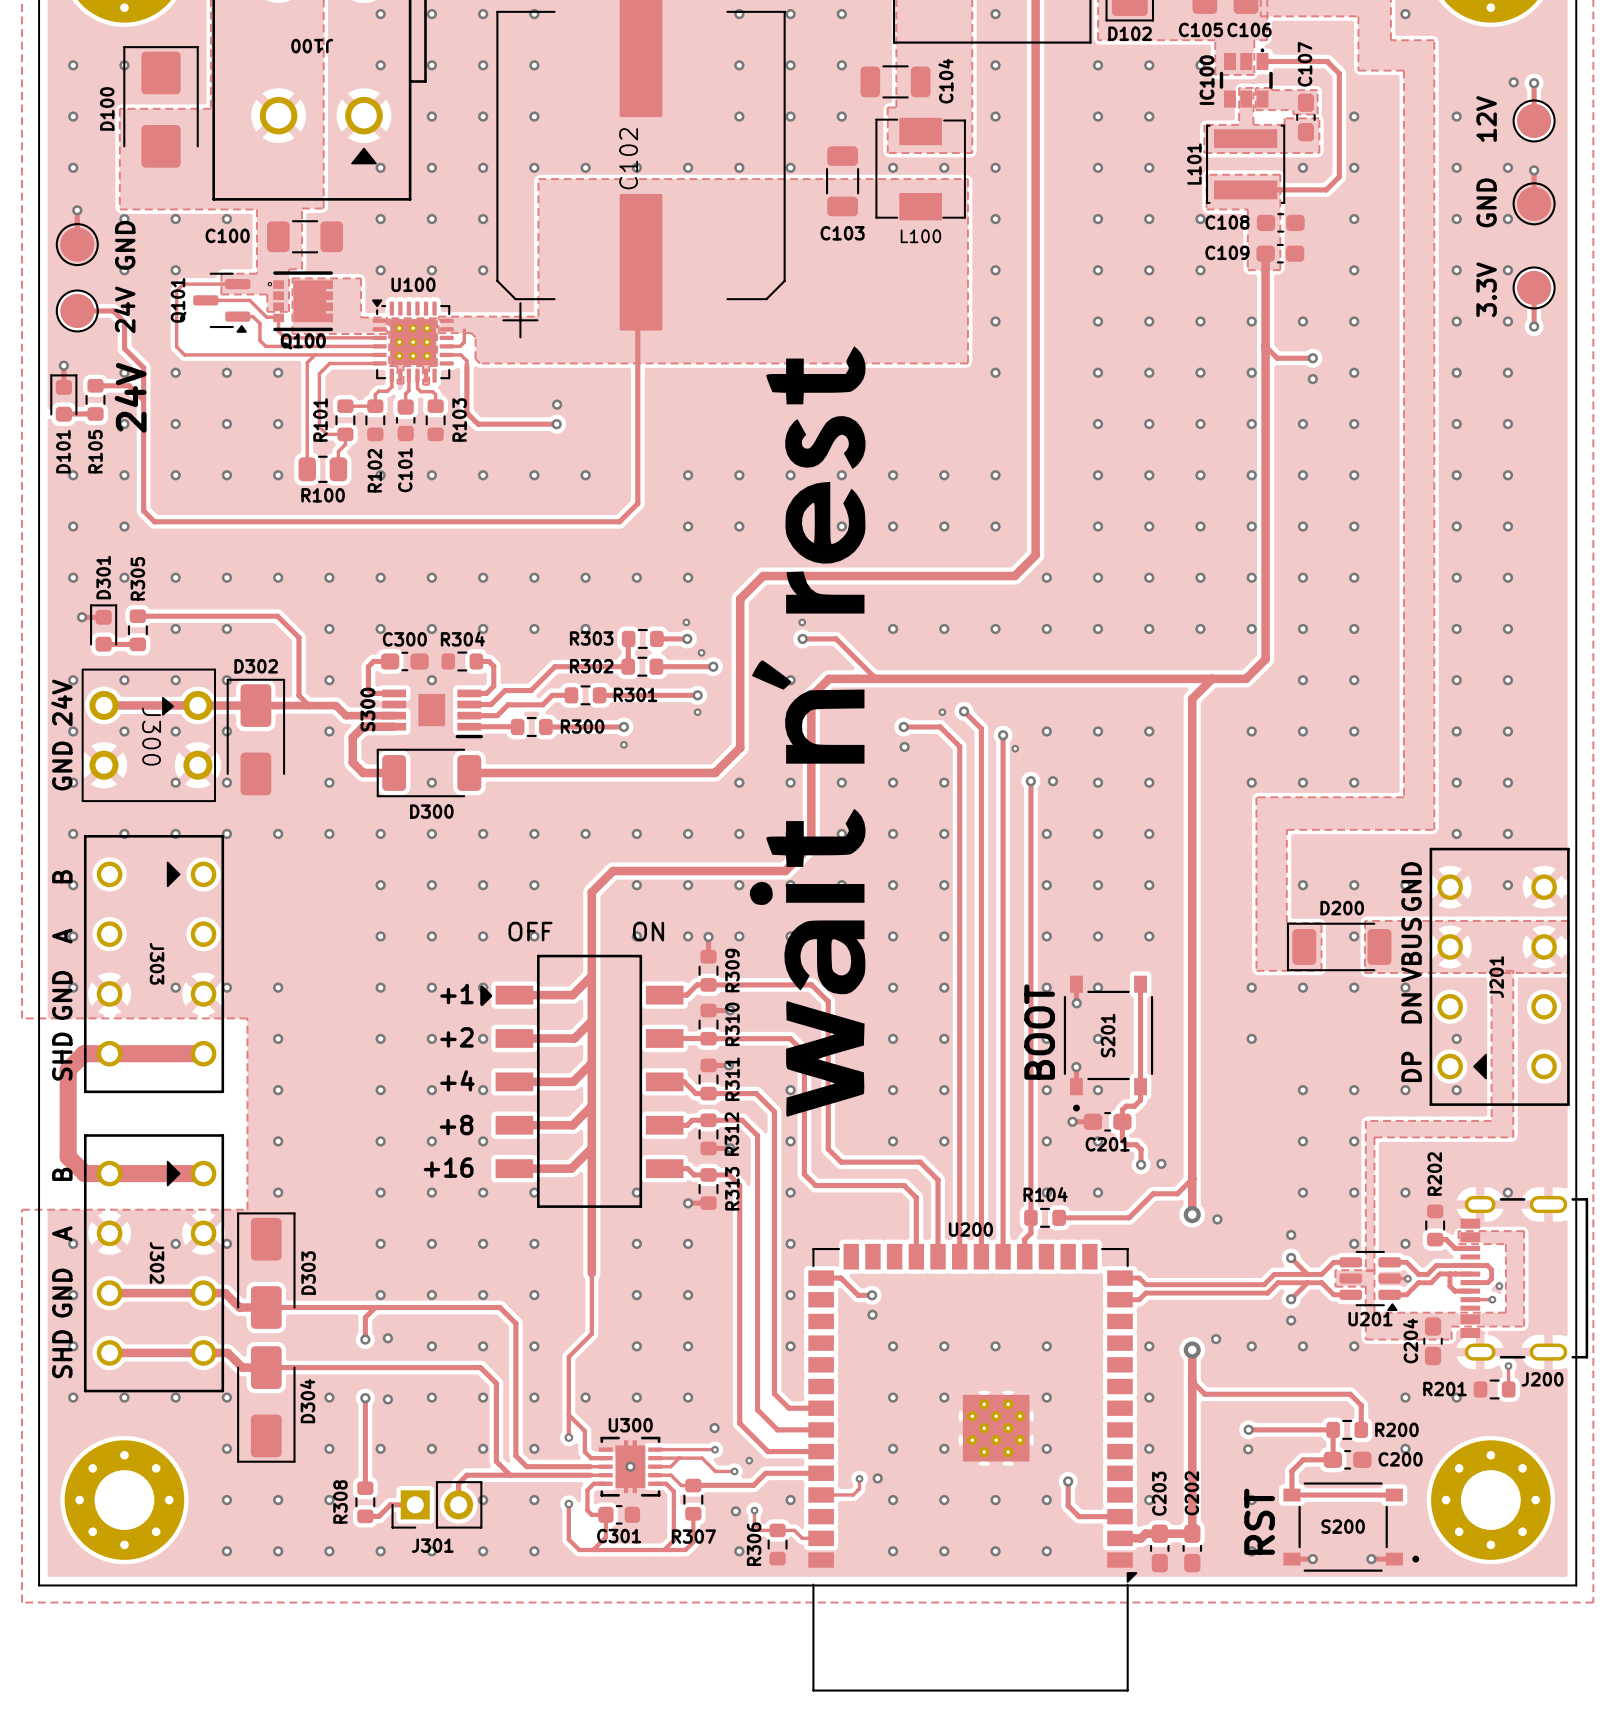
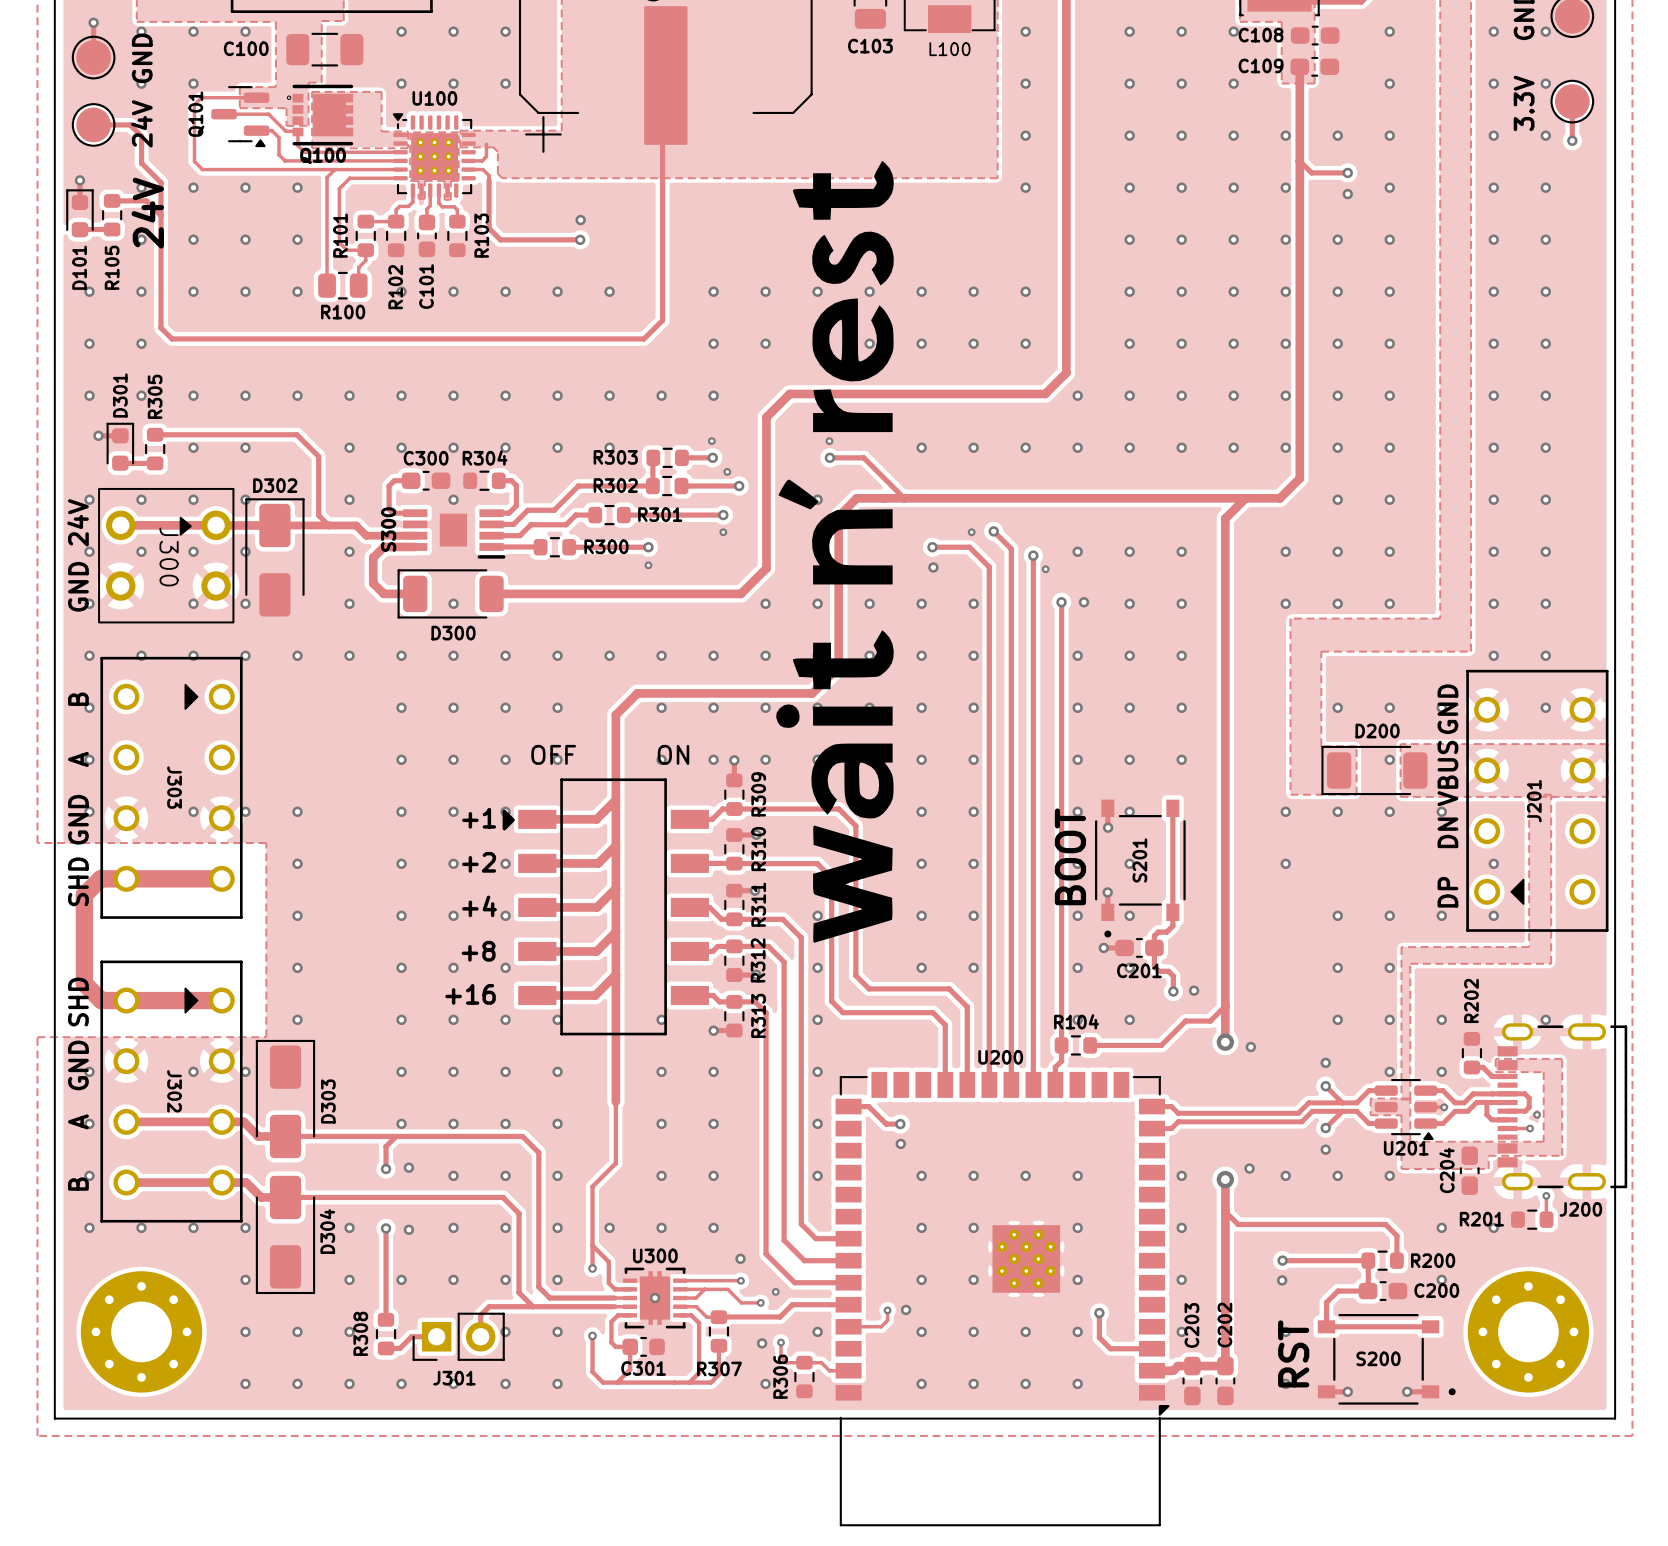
text position: B (62, 1174) -> B (78, 1184)
text position: A (62, 1233) -> A (78, 1121)
text position: GND (62, 1293) -> GND (78, 1065)
text position: SHD (62, 1354) -> SHD (78, 1002)

